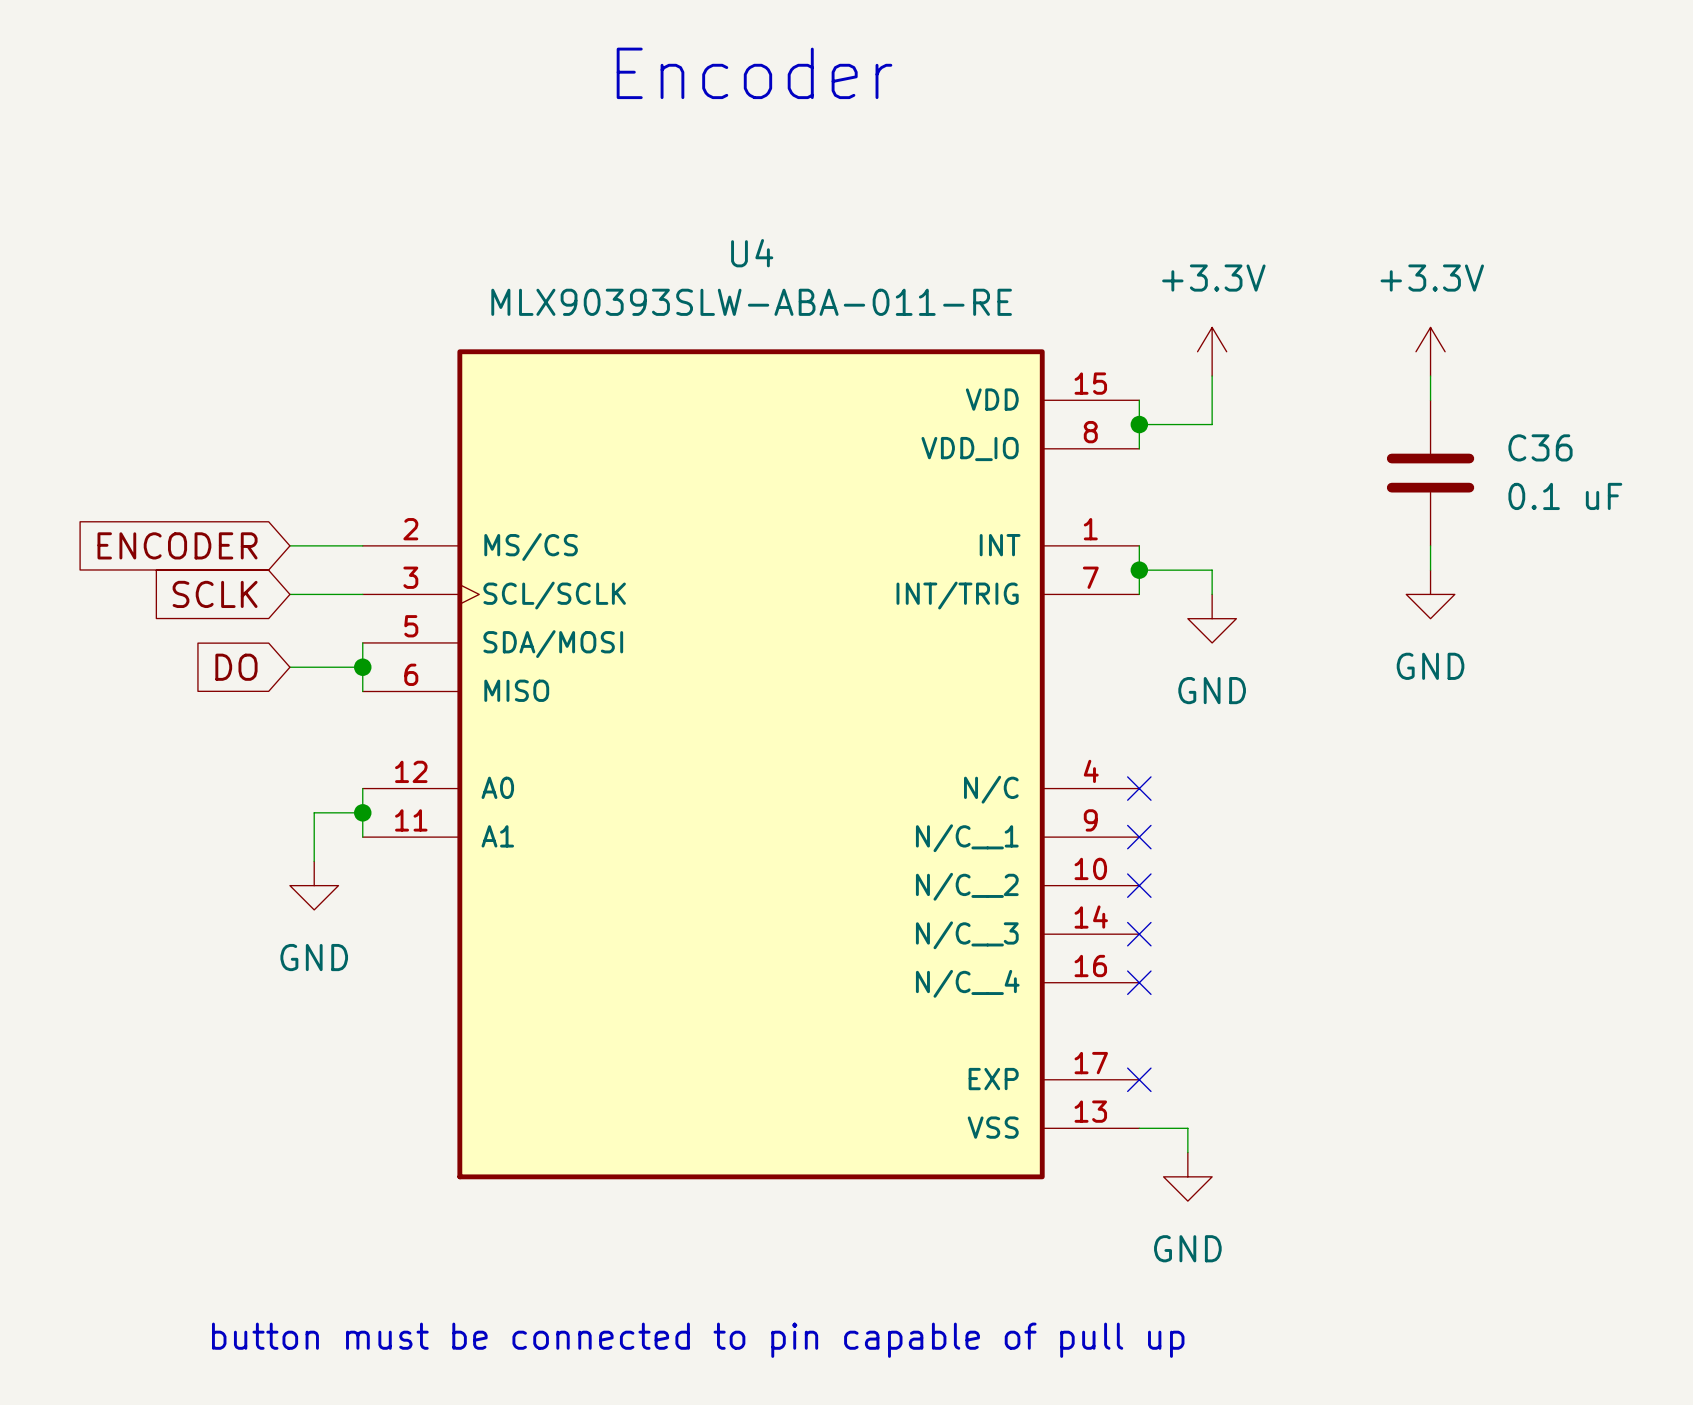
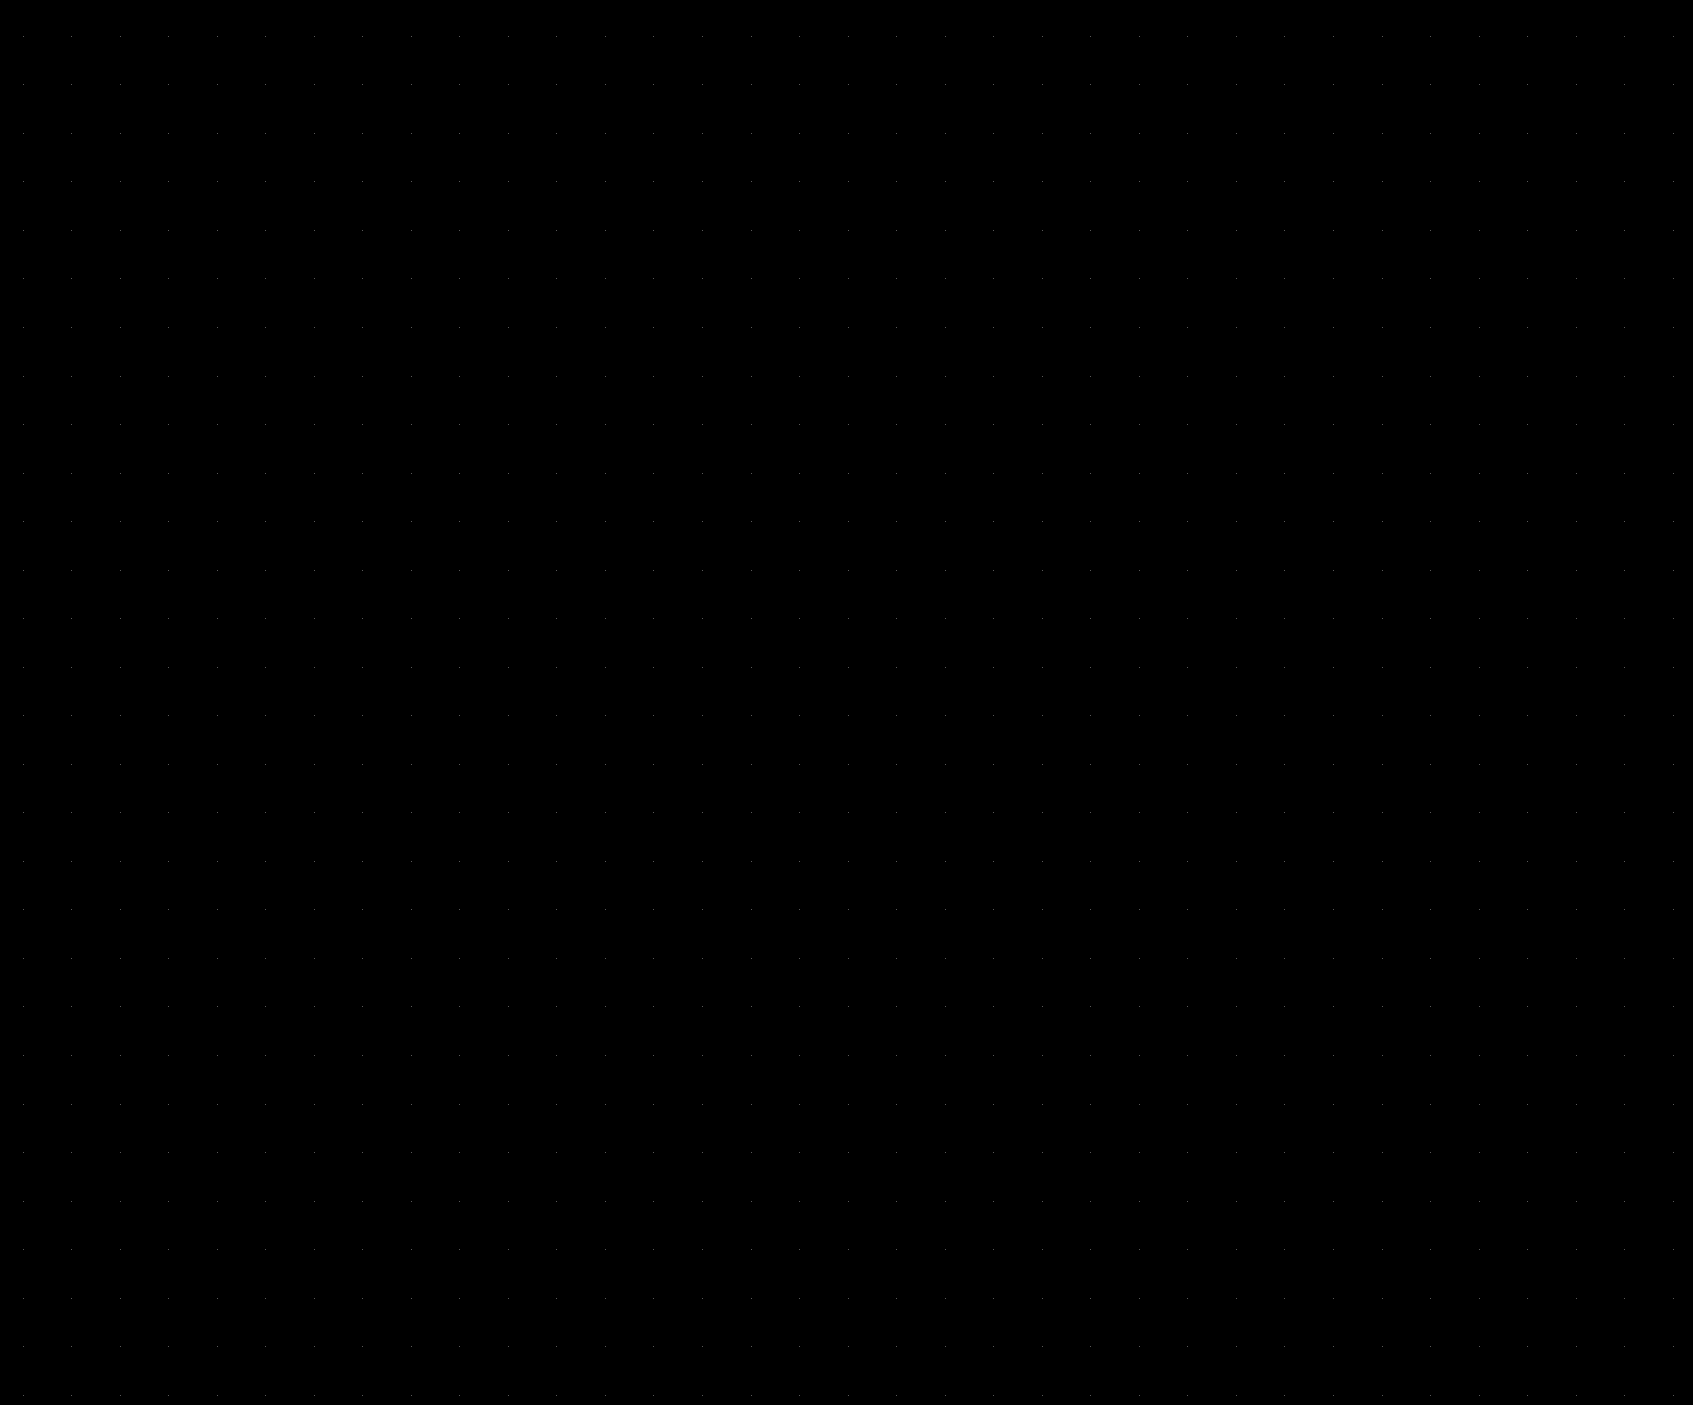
text: Encoder (754, 73) -> none
power symbol: +3.3V (1212, 351) -> none
power symbol: +3.3V (1430, 351) -> none
wire: (1212, 376) (1212, 424) (1139, 424) -> none
wire: (1430, 376) (1430, 400) -> none
wire: (1139, 400) (1139, 448) -> none
junction: (1139, 424) -> none
C36: 0.1 uF (1430, 473) -> none
global label: ENCODER (177, 545) -> none
wire: (289, 545) (362, 545) -> none
wire: (1139, 545) (1139, 594) -> none
wire: (1430, 545) (1430, 570) -> none
wire: (1139, 570) (1212, 570) (1212, 594) -> none
junction: (1139, 570) -> none
global label: SCLK (215, 594) -> none
wire: (289, 594) (362, 594) -> none
power symbol: GND (1430, 594) -> none
power symbol: GND (1212, 618) -> none
wire: (362, 642) (362, 691) -> none
global label: DO (236, 667) -> none
wire: (289, 667) (362, 667) -> none
junction: (362, 667) -> none
U4: MLX90393SLW-ABA-011-RE (751, 764) -> none
wire: (362, 788) (362, 837) -> none
no-connect mark: (1139, 788) -> none
wire: (362, 812) (314, 812) (314, 861) -> none
junction: (362, 812) -> none
no-connect mark: (1139, 837) -> none
power symbol: GND (314, 885) -> none
no-connect mark: (1139, 885) -> none
no-connect mark: (1139, 934) -> none
no-connect mark: (1139, 982) -> none
no-connect mark: (1139, 1079) -> none
wire: (1139, 1128) (1187, 1128) (1187, 1152) -> none
power symbol: GND (1187, 1176) -> none
text: button must be connected to pin capable of pull up (698, 1340) -> none

